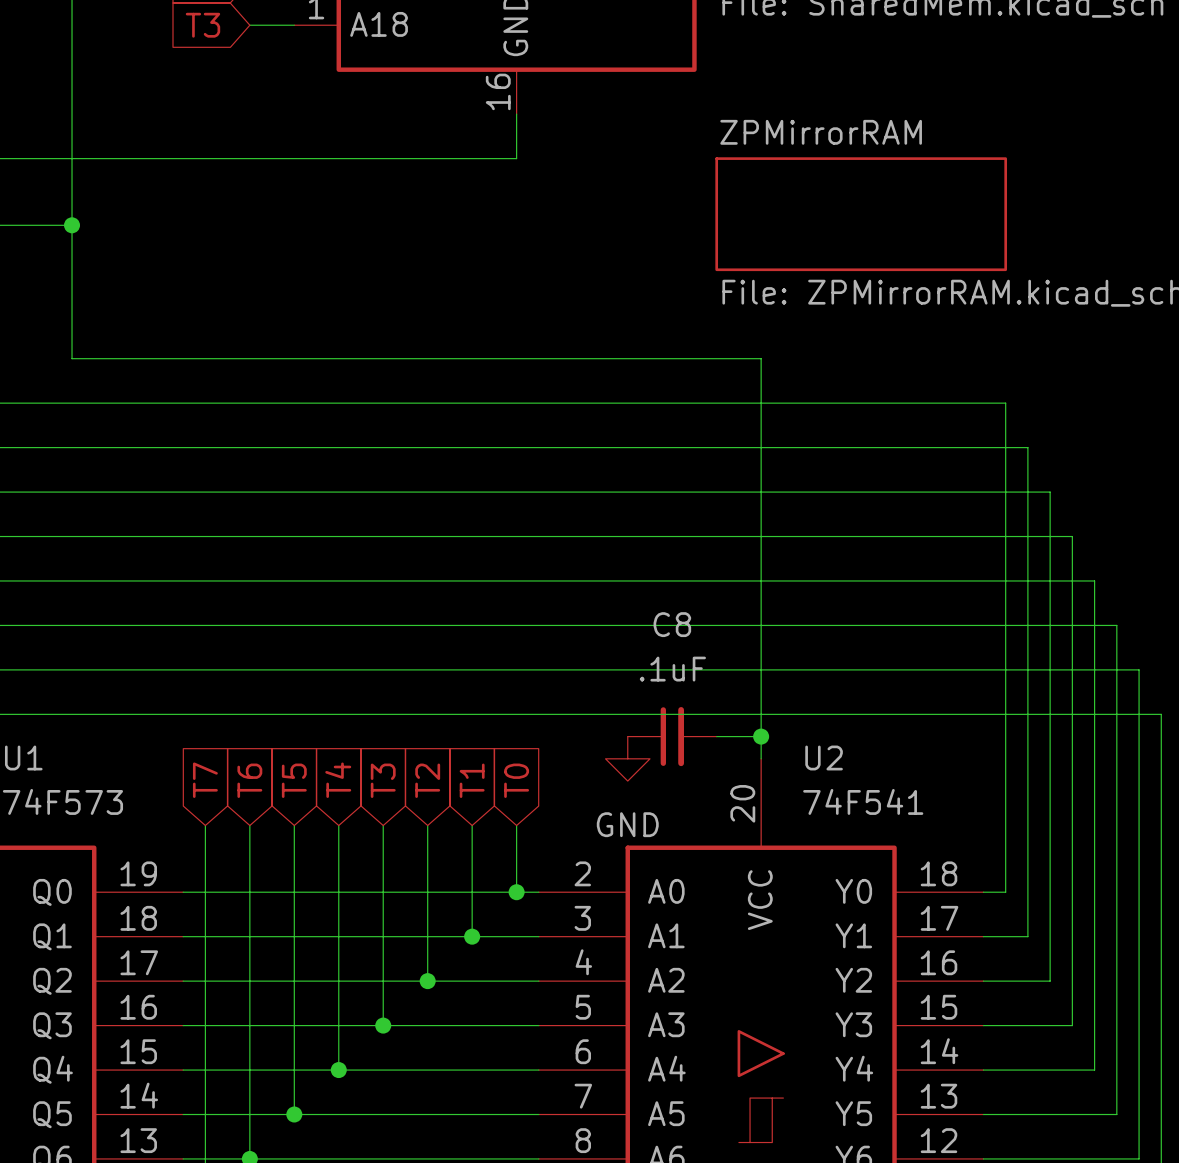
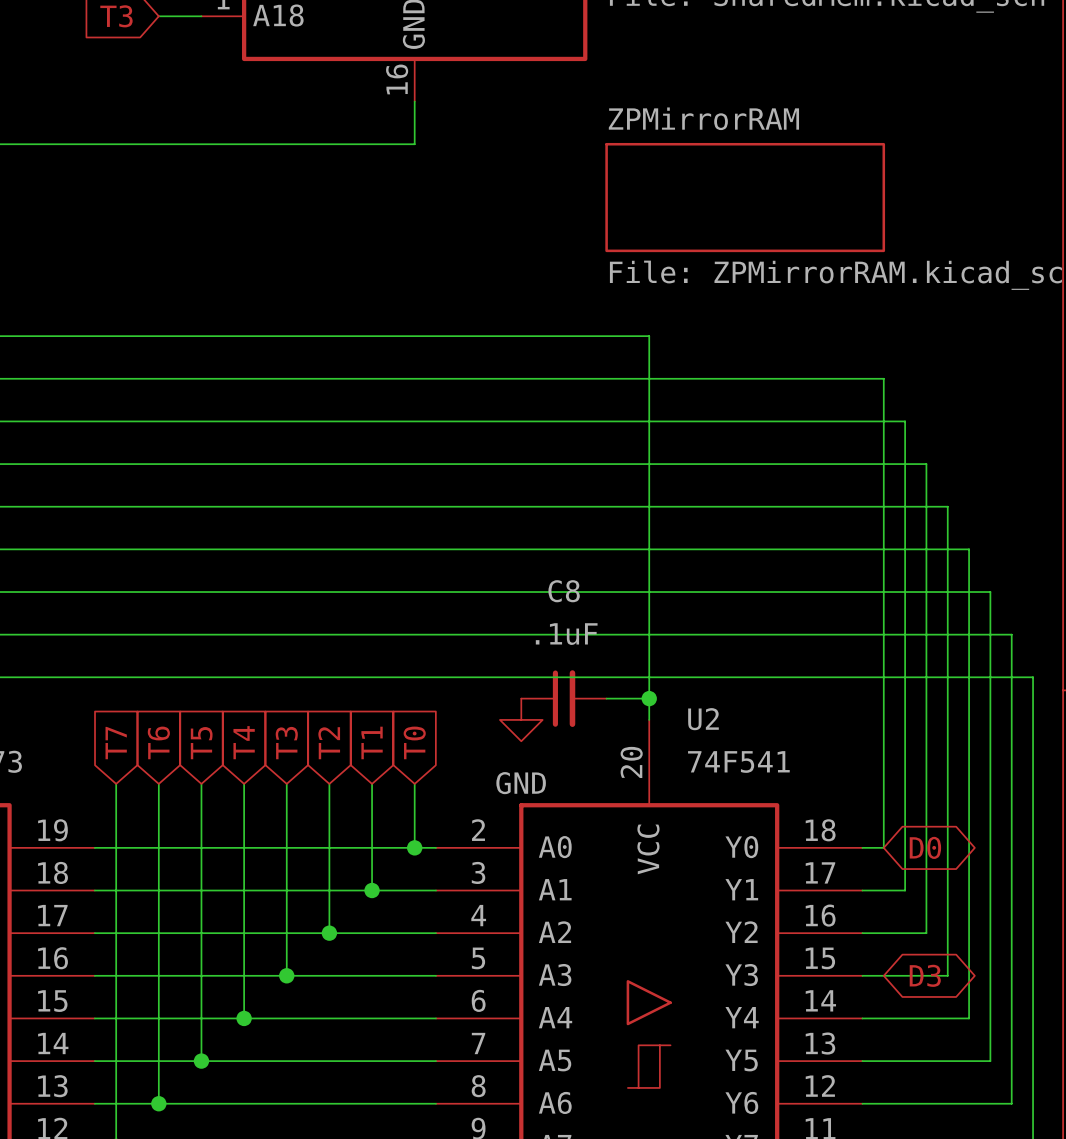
global label: none -> D0 (925, 847)
global label: none -> D3 (925, 975)

